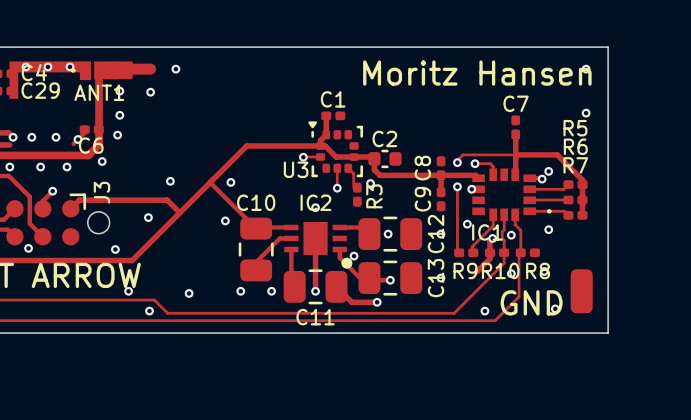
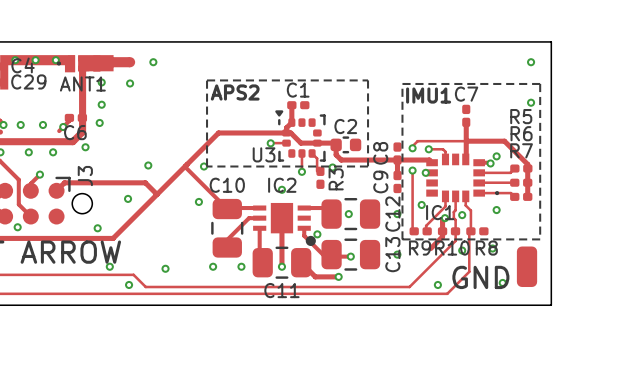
text: Moritz Hansen (477, 73) -> none
line: none -> (207, 80) (368, 80) (368, 166) (207, 166) (207, 80)
line: none -> (402, 83) (540, 83) (540, 239) (402, 239) (402, 83)
text: none -> APS2 (235, 92)
text: none -> IMU1 (428, 95)

